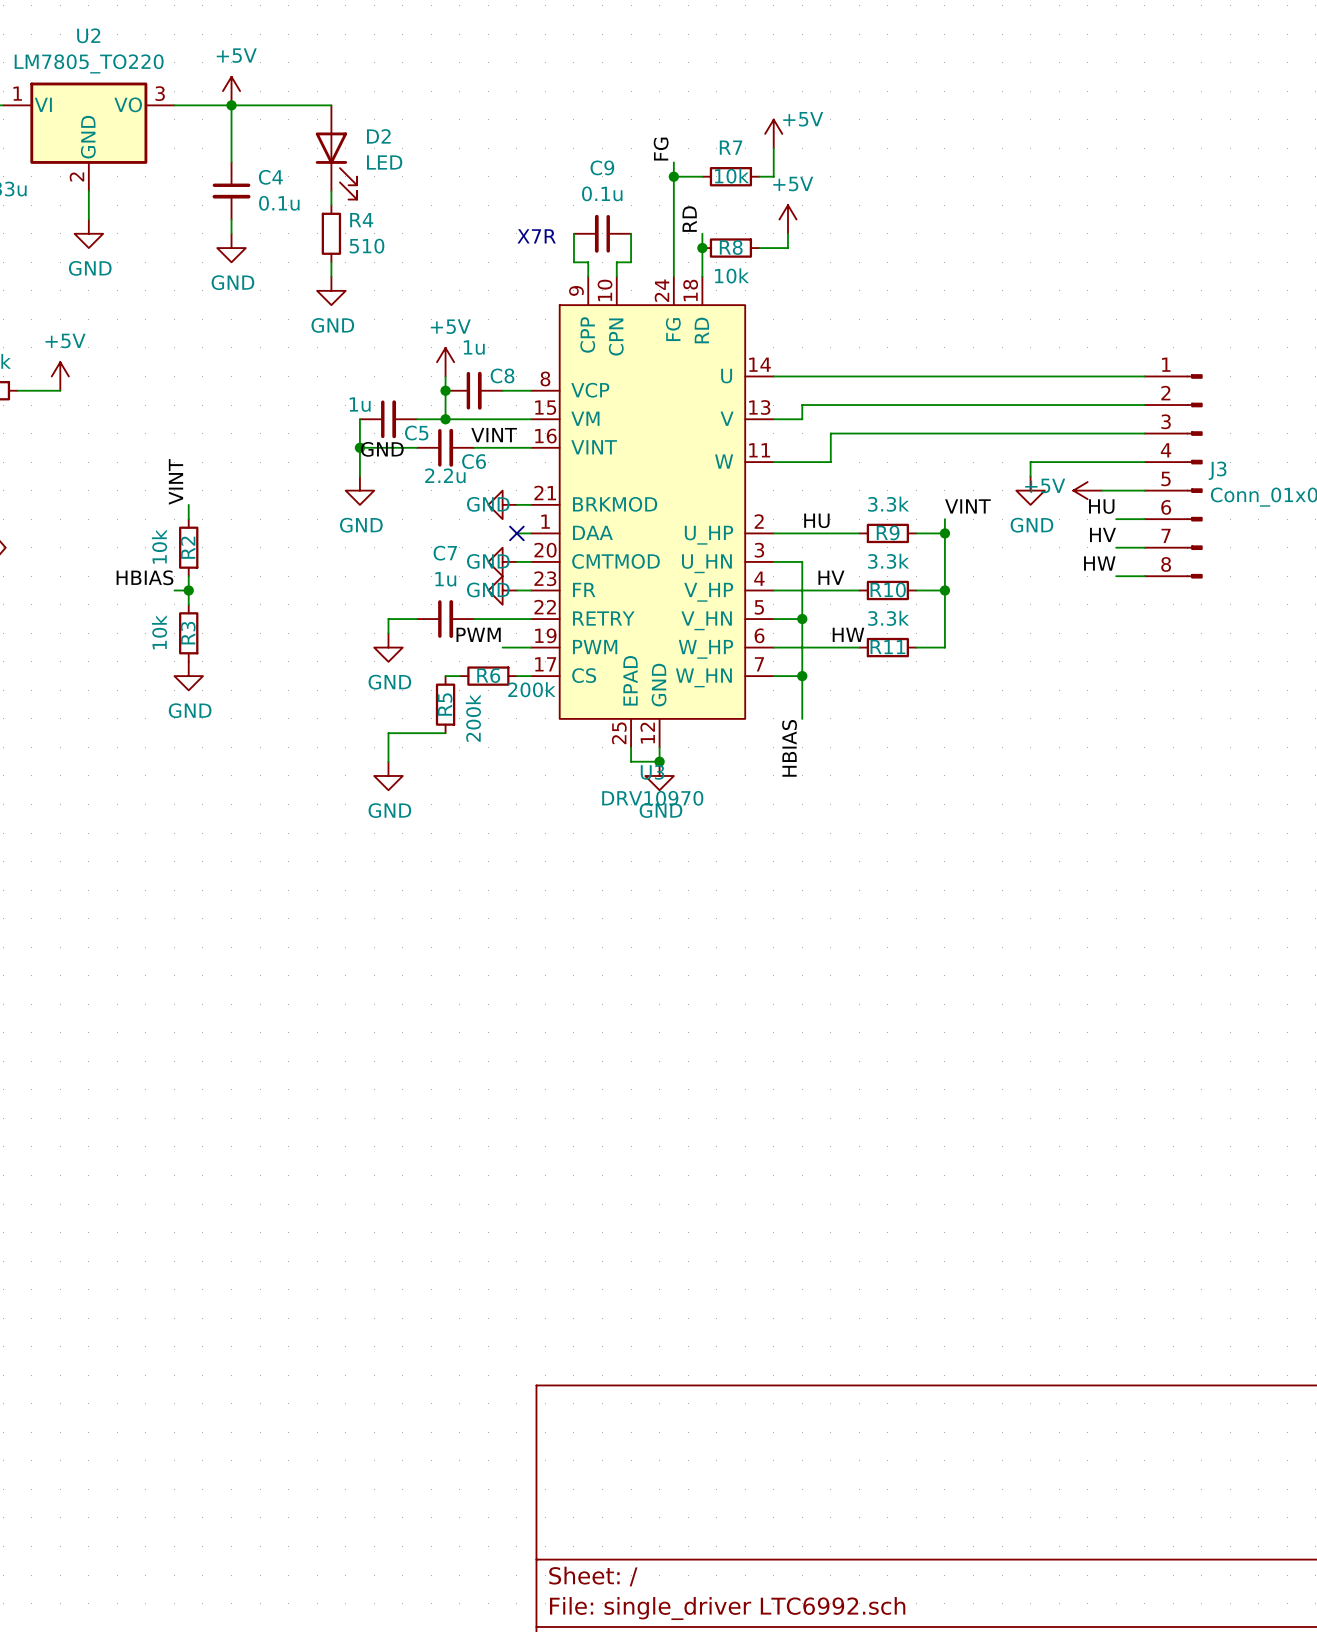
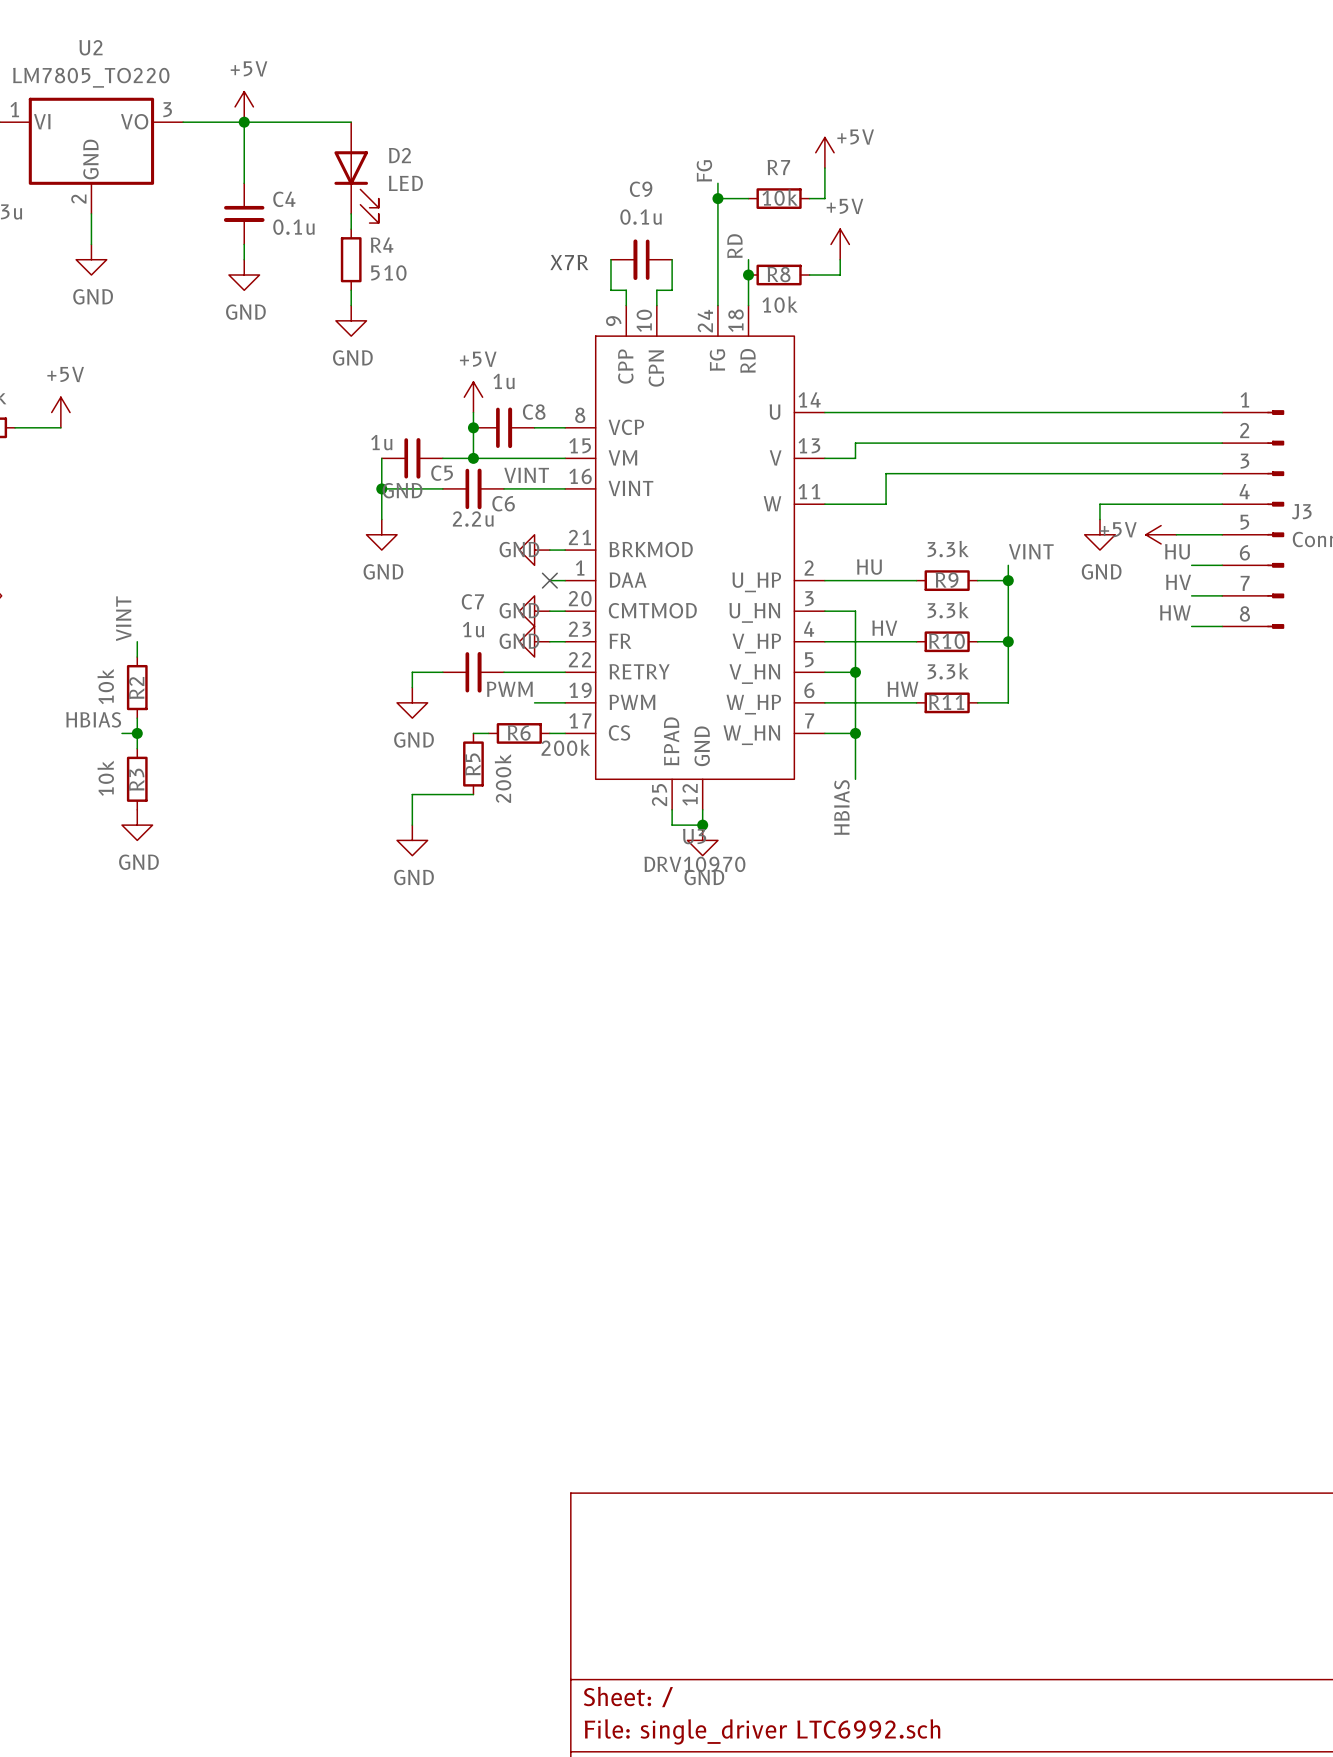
label position: VINT (175, 481) -> VINT (123, 618)
wire: (188, 504) (188, 519) -> (137, 641) (137, 657)
R2 position: (188, 547) -> (137, 687)
wire: (188, 576) (188, 604) -> (137, 718) (137, 748)
label position: HBIAS (145, 577) -> HBIAS (93, 719)
wire: (174, 590) (188, 590) -> (122, 733) (137, 733)
junction: (188, 590) -> none
R3 position: (188, 633) -> (137, 779)
junction: none -> (137, 733)
power symbol position: GND (188, 676) -> GND (137, 825)

